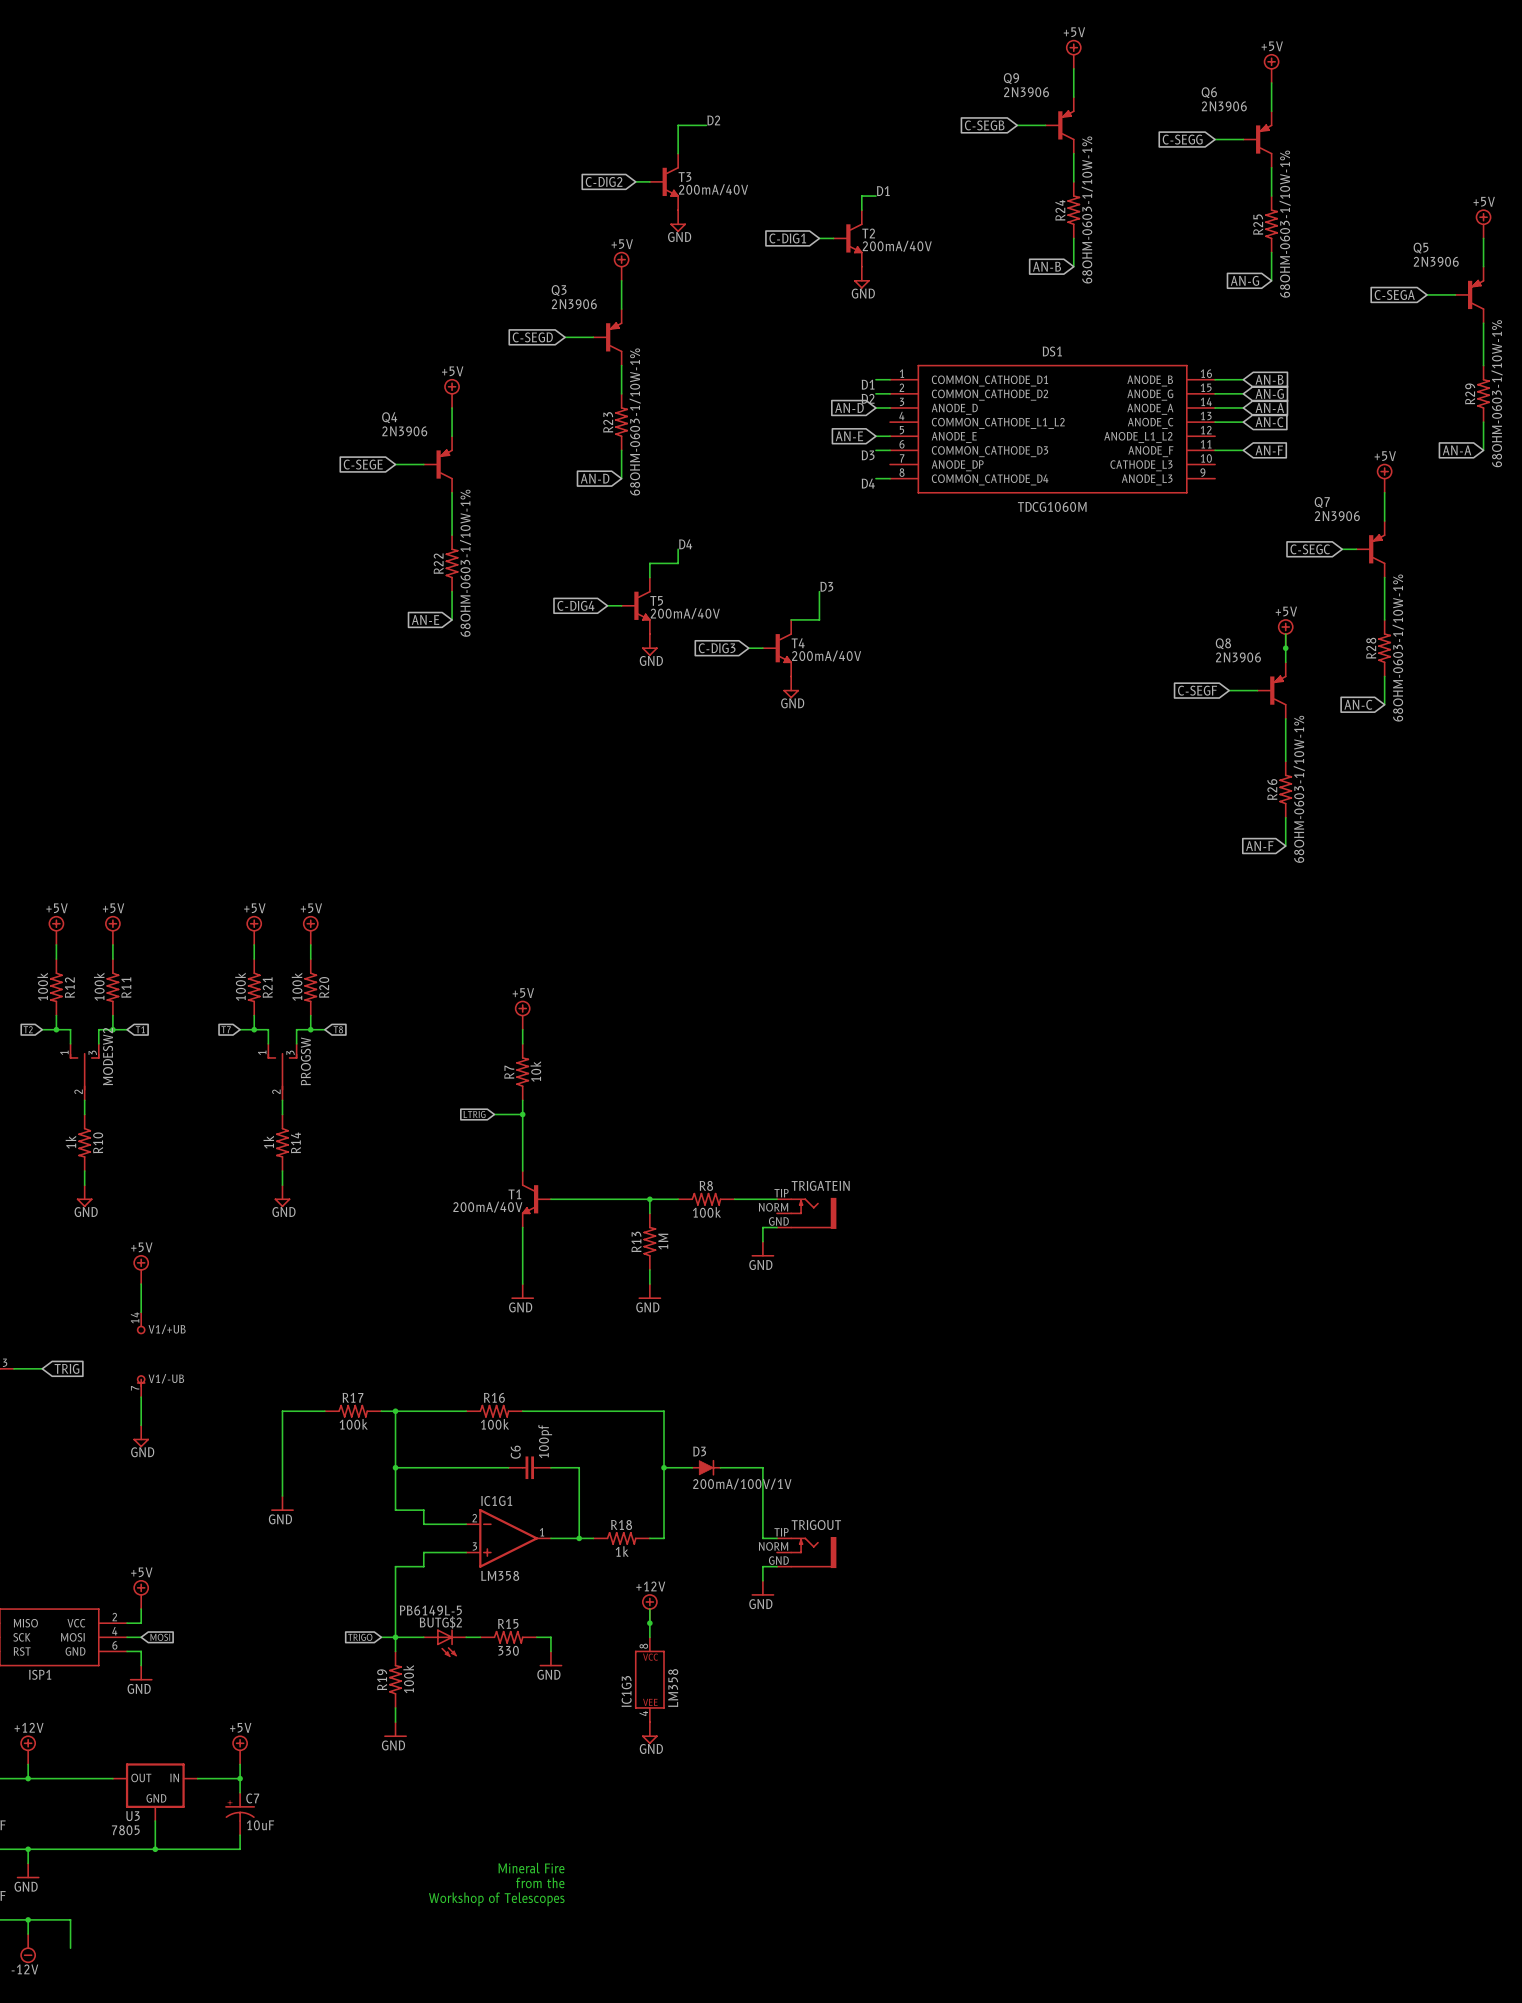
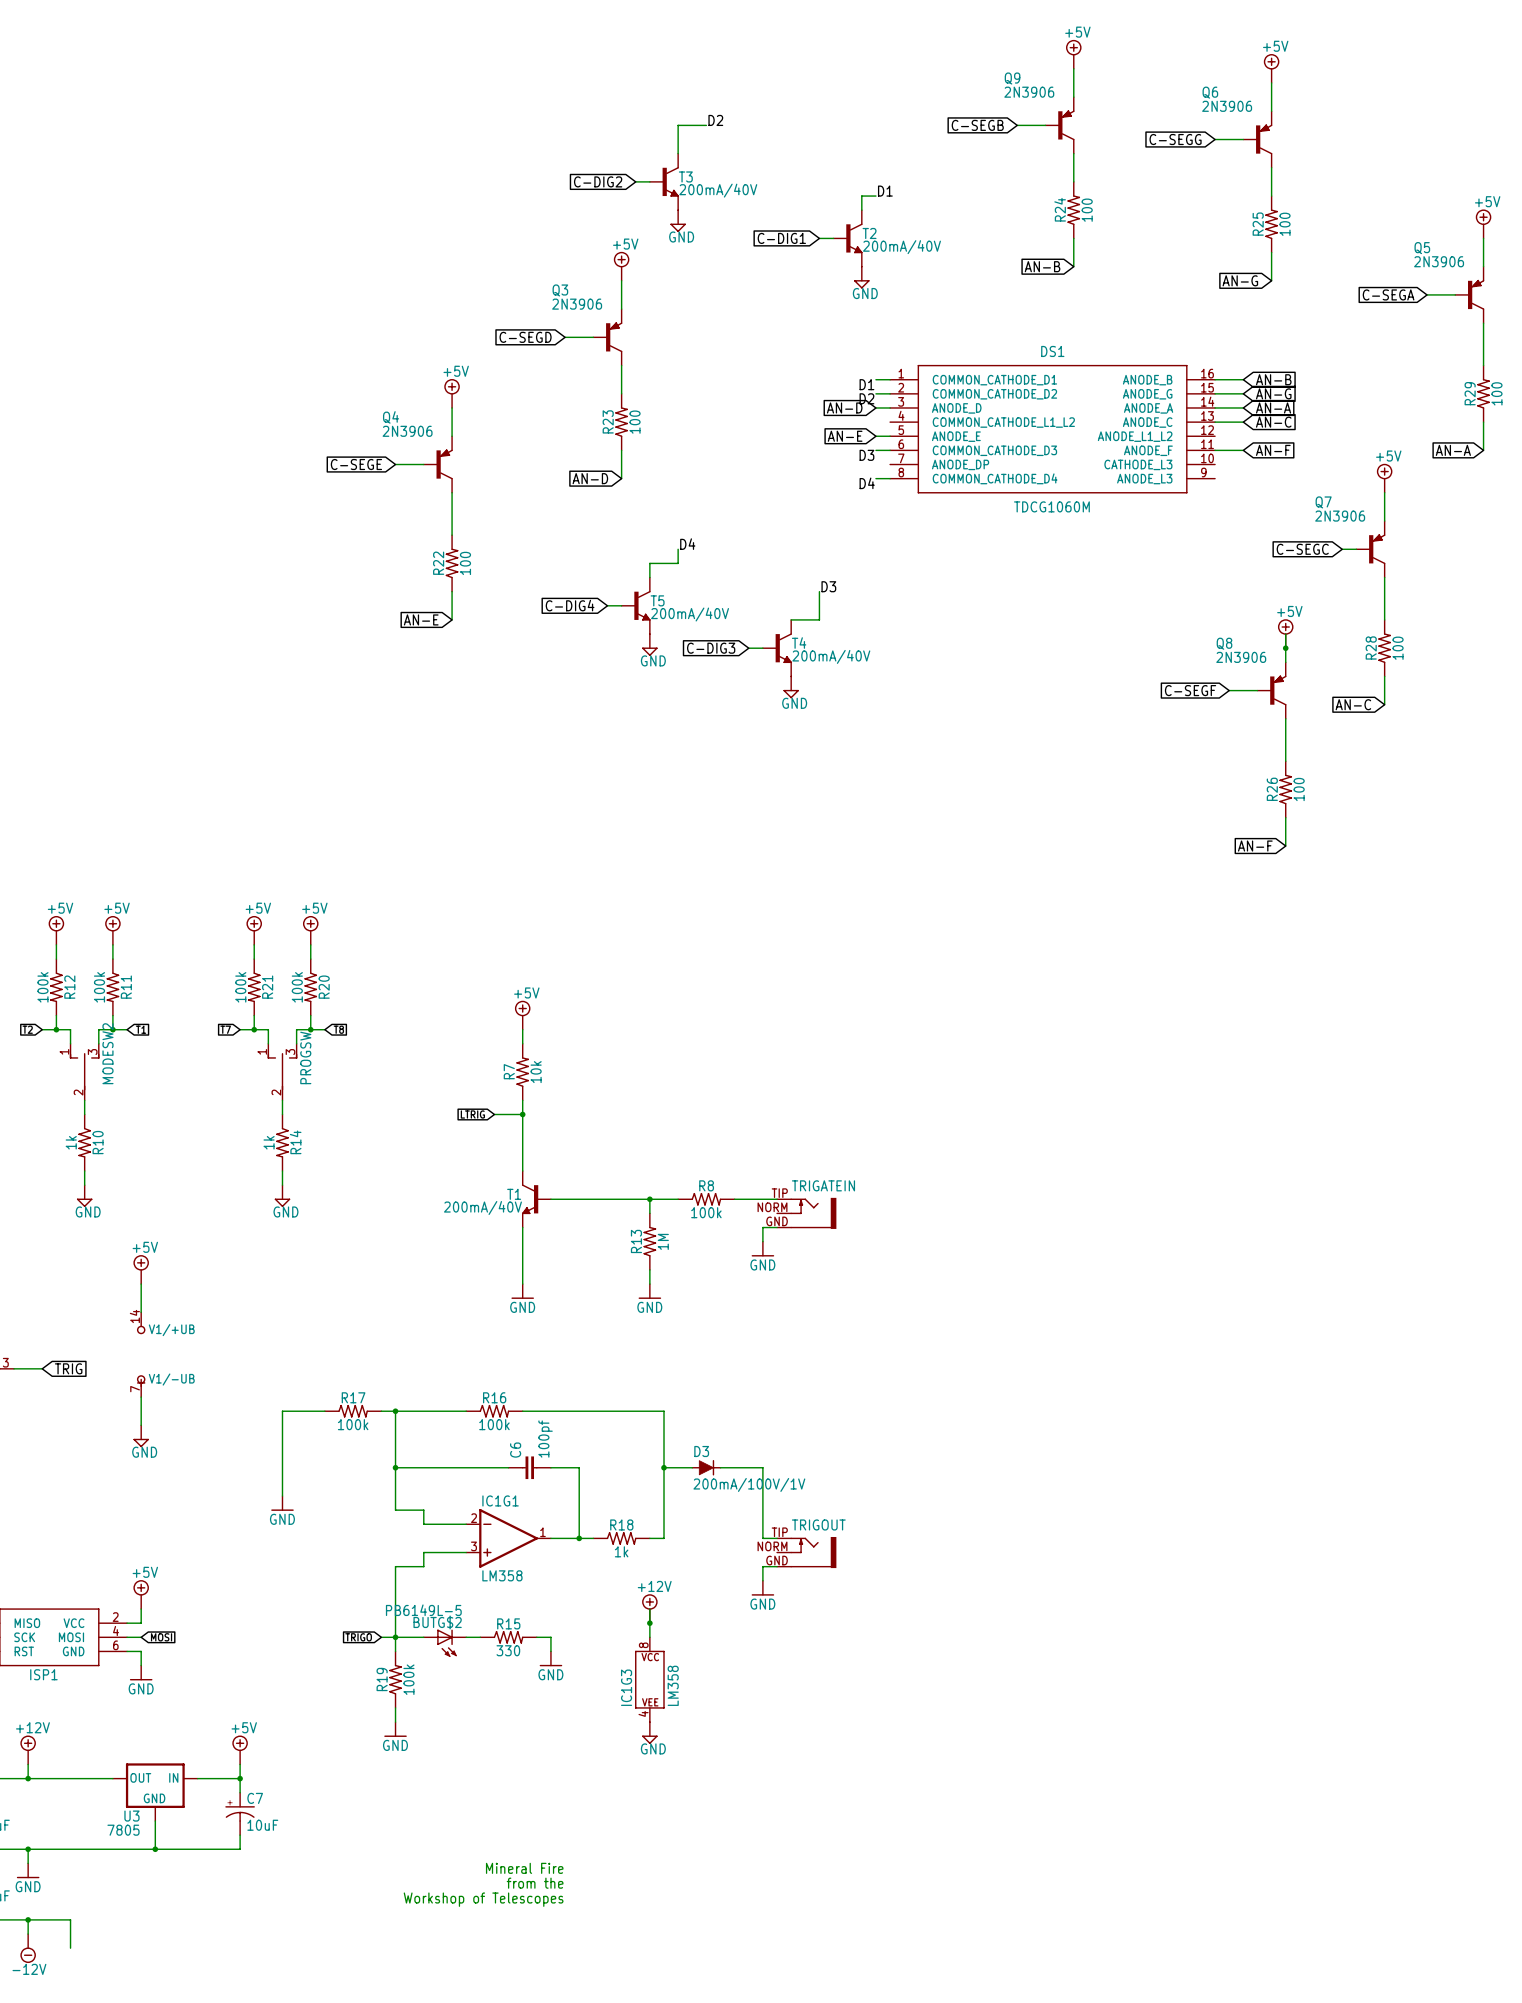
R24 value: 68OHM-0603-1/10W-1% (1087, 210) -> 100 (1087, 210)
R25 value: 68OHM-0603-1/10W-1% (1285, 224) -> 100 (1285, 224)
R29 value: 68OHM-0603-1/10W-1% (1497, 393) -> 100 (1496, 393)
R23 value: 68OHM-0603-1/10W-1% (635, 421) -> 100 (635, 422)
R22 value: 68OHM-0603-1/10W-1% (465, 563) -> 100 (465, 563)
R28 value: 68OHM-0603-1/10W-1% (1398, 648) -> 100 (1398, 648)
R26 value: 68OHM-0603-1/10W-1% (1299, 789) -> 100 (1299, 789)

